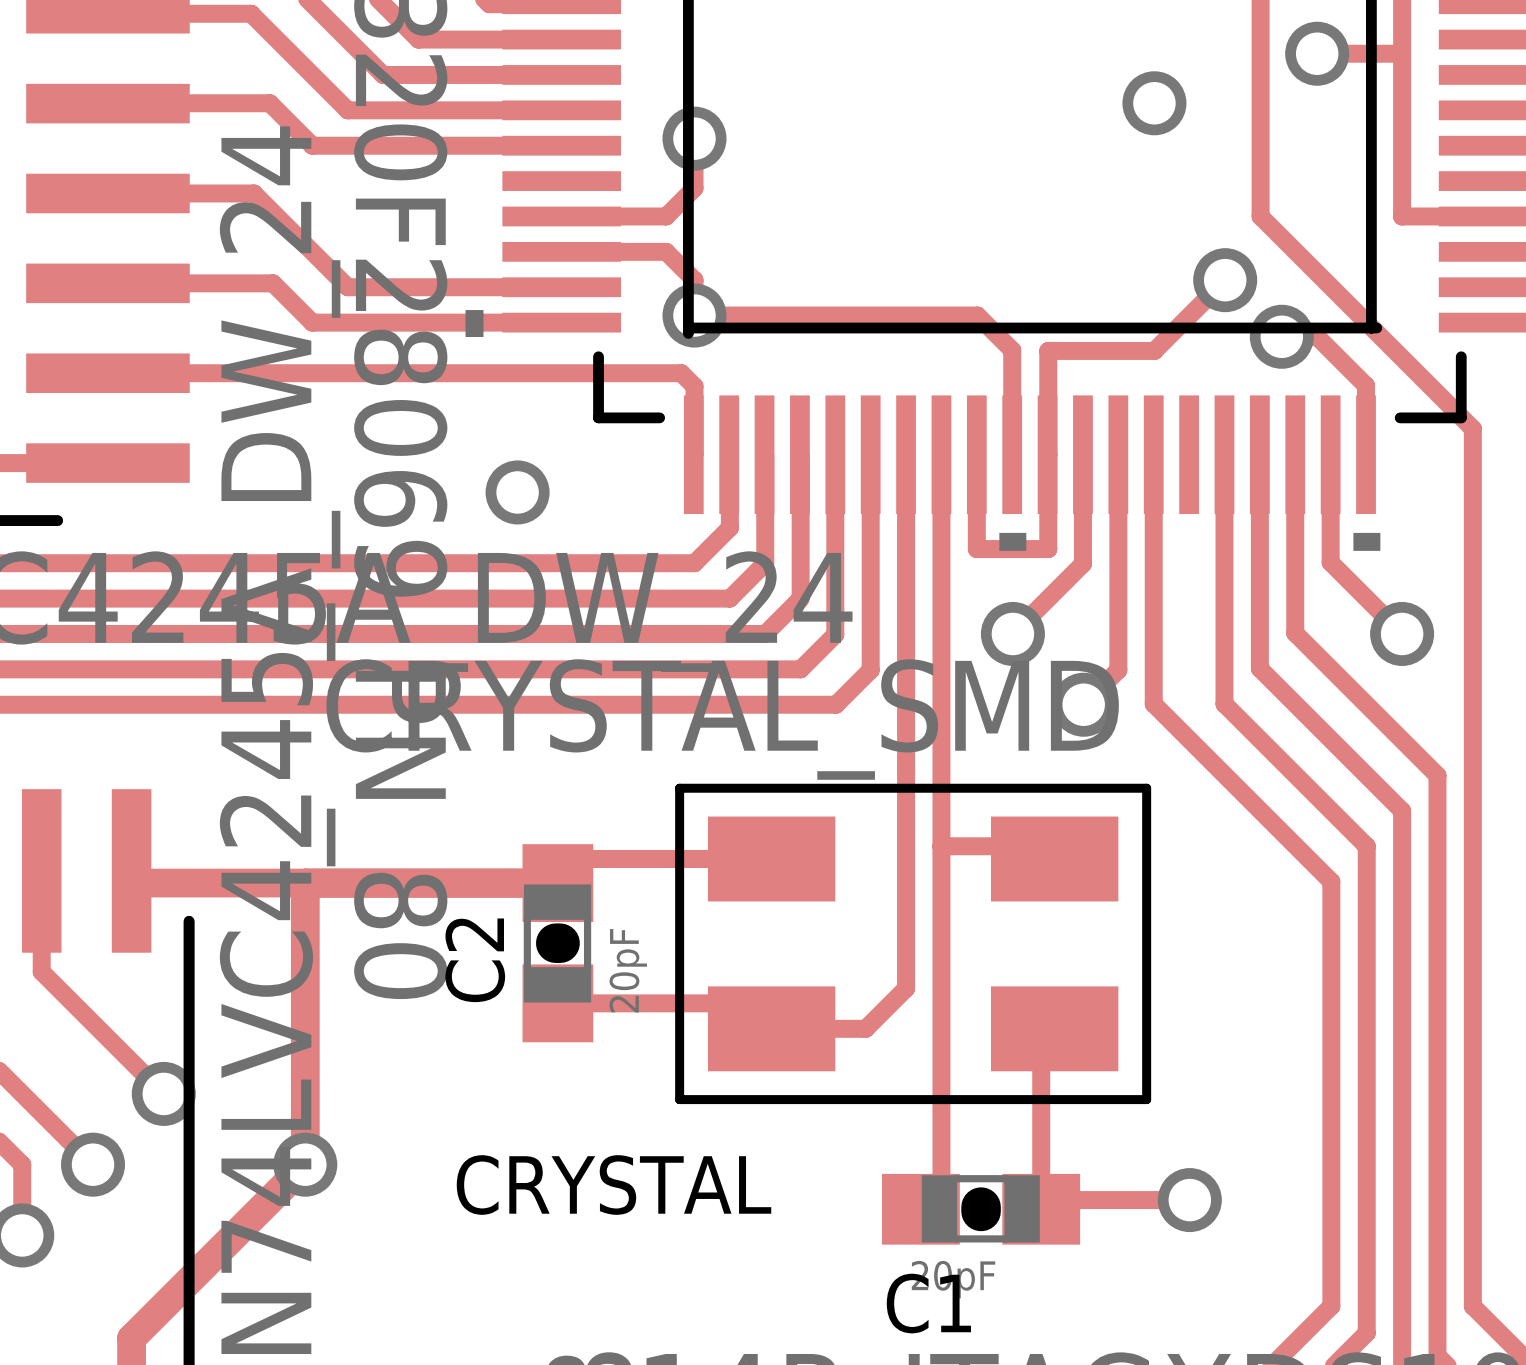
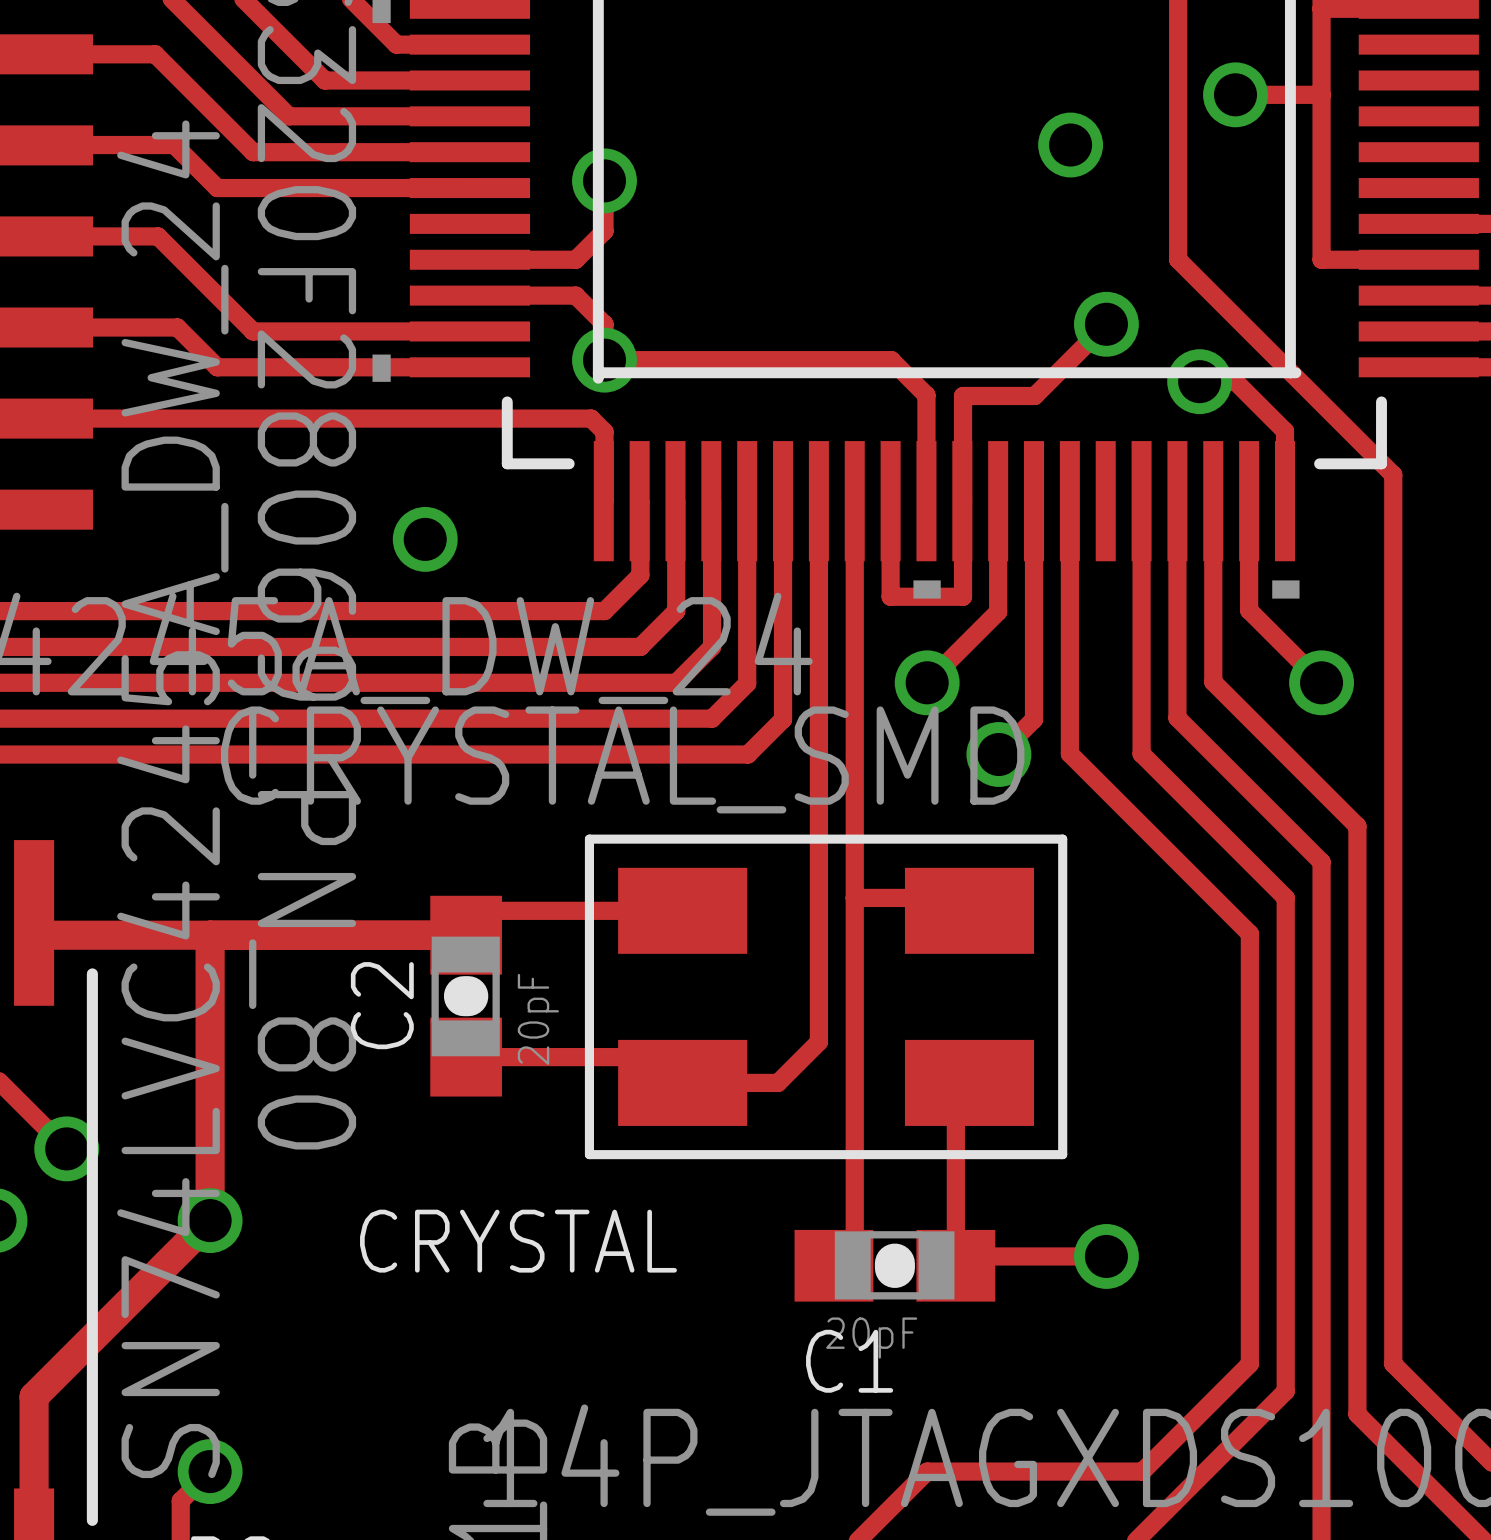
track: (1225, 280) (1154, 350) (1119, 350) -> (1106, 324) (1034, 395)
via position: (1225, 280) -> (1106, 324)

